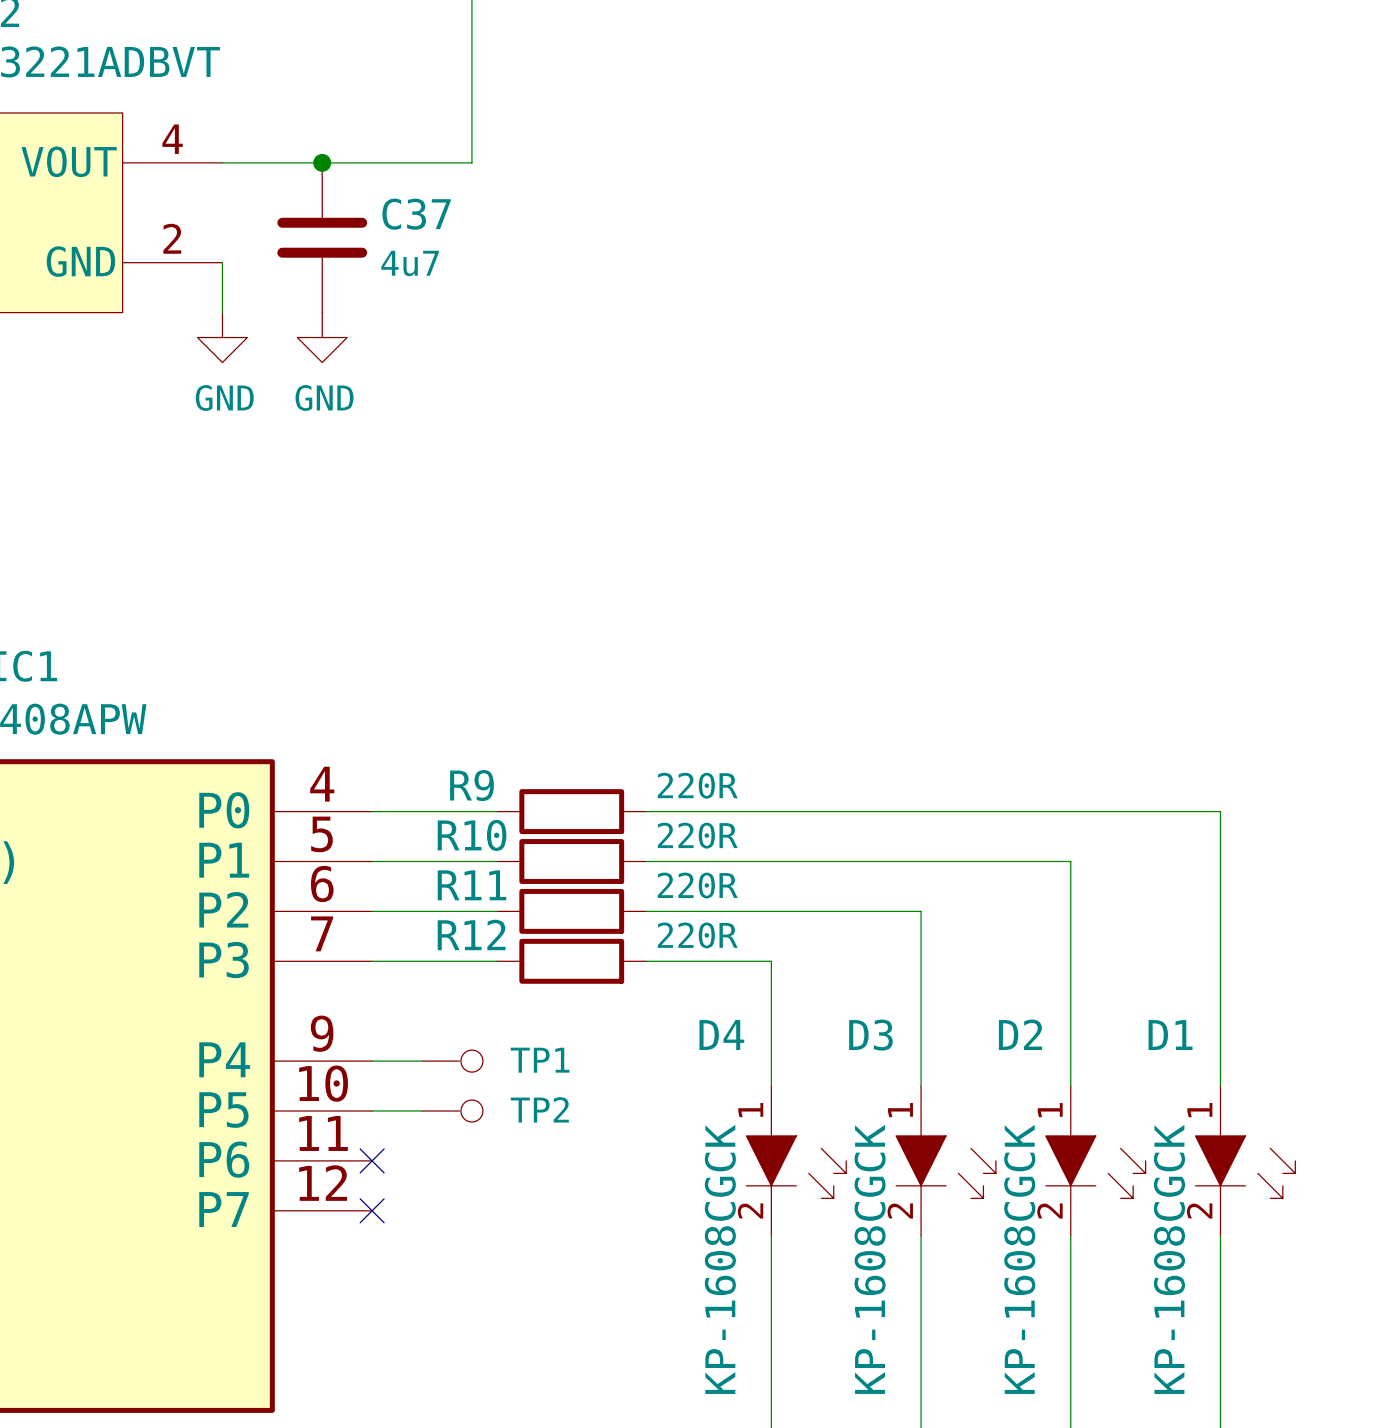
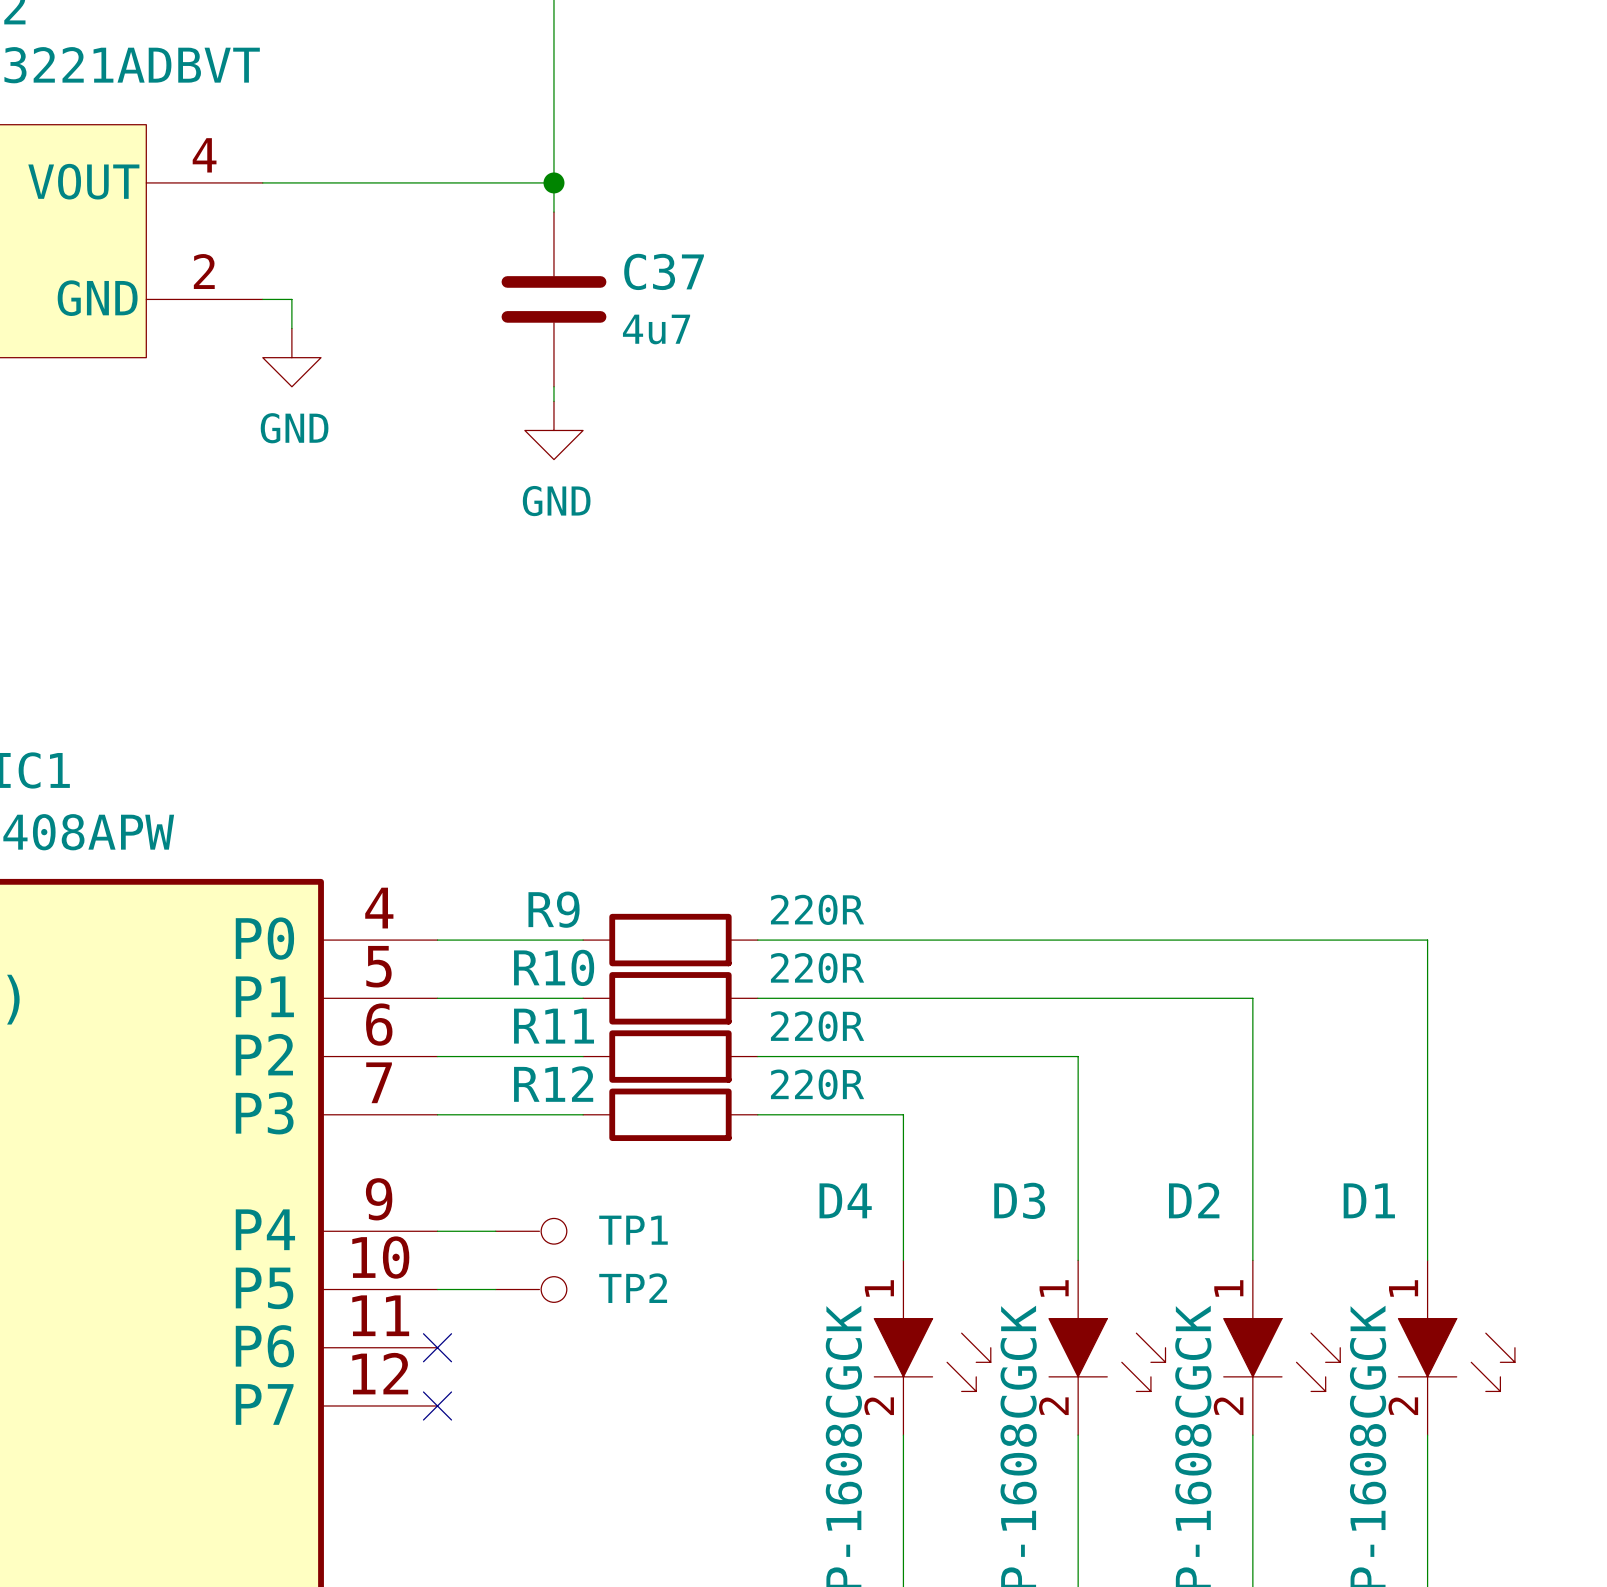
junction: (322, 162) -> none
wire: none -> (553, 182) (553, 212)
junction: none -> (553, 182)
C37 position: (322, 237) -> (553, 299)
wire: (222, 262) (222, 312) -> (262, 299) (291, 299) (291, 328)
power symbol position: GND (222, 337) -> GND (291, 357)
power symbol: GND (322, 337) -> none
wire: none -> (553, 386) (553, 401)
power symbol: none -> GND (553, 430)

